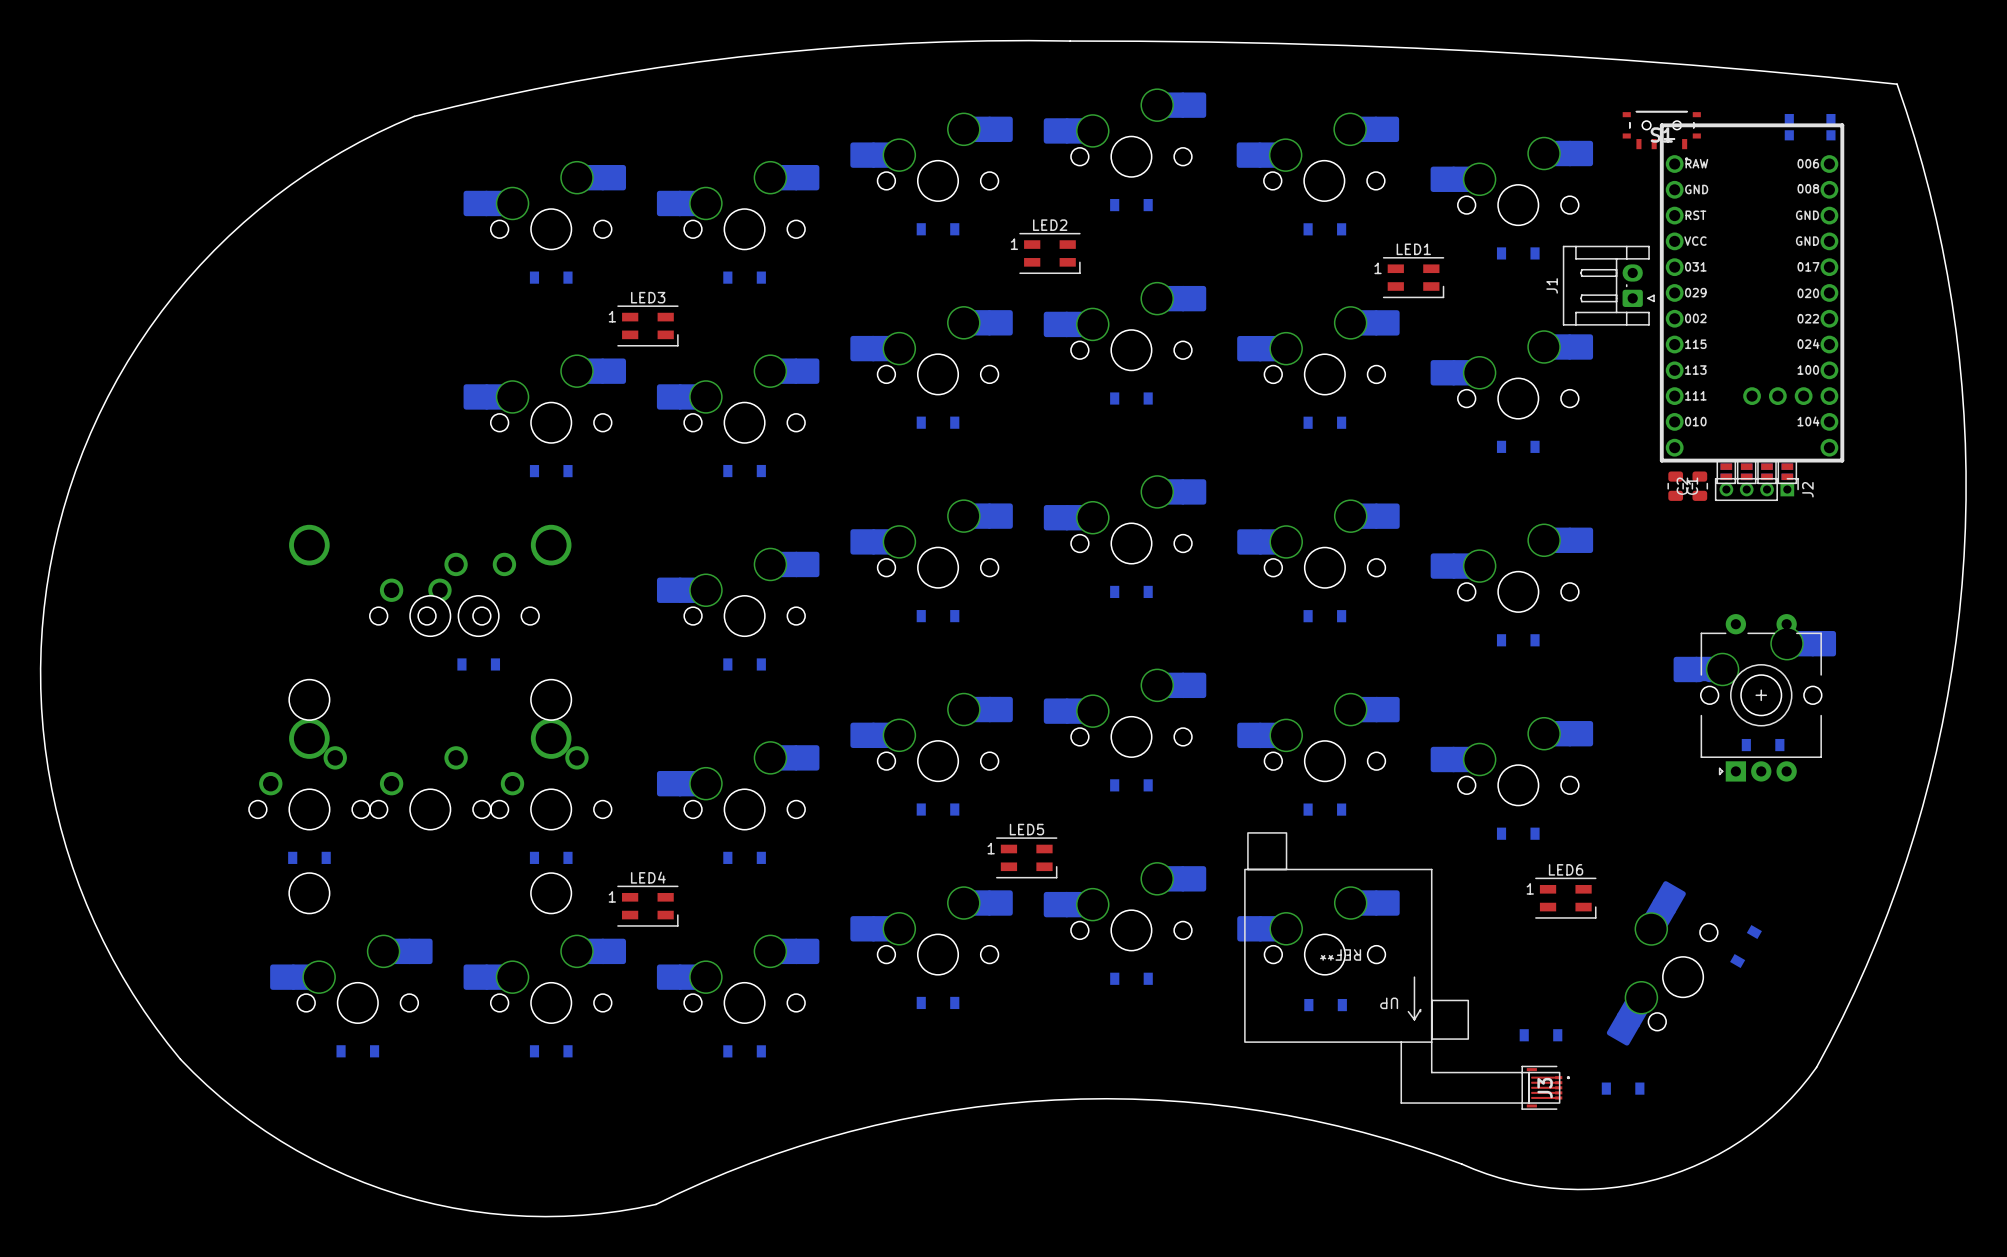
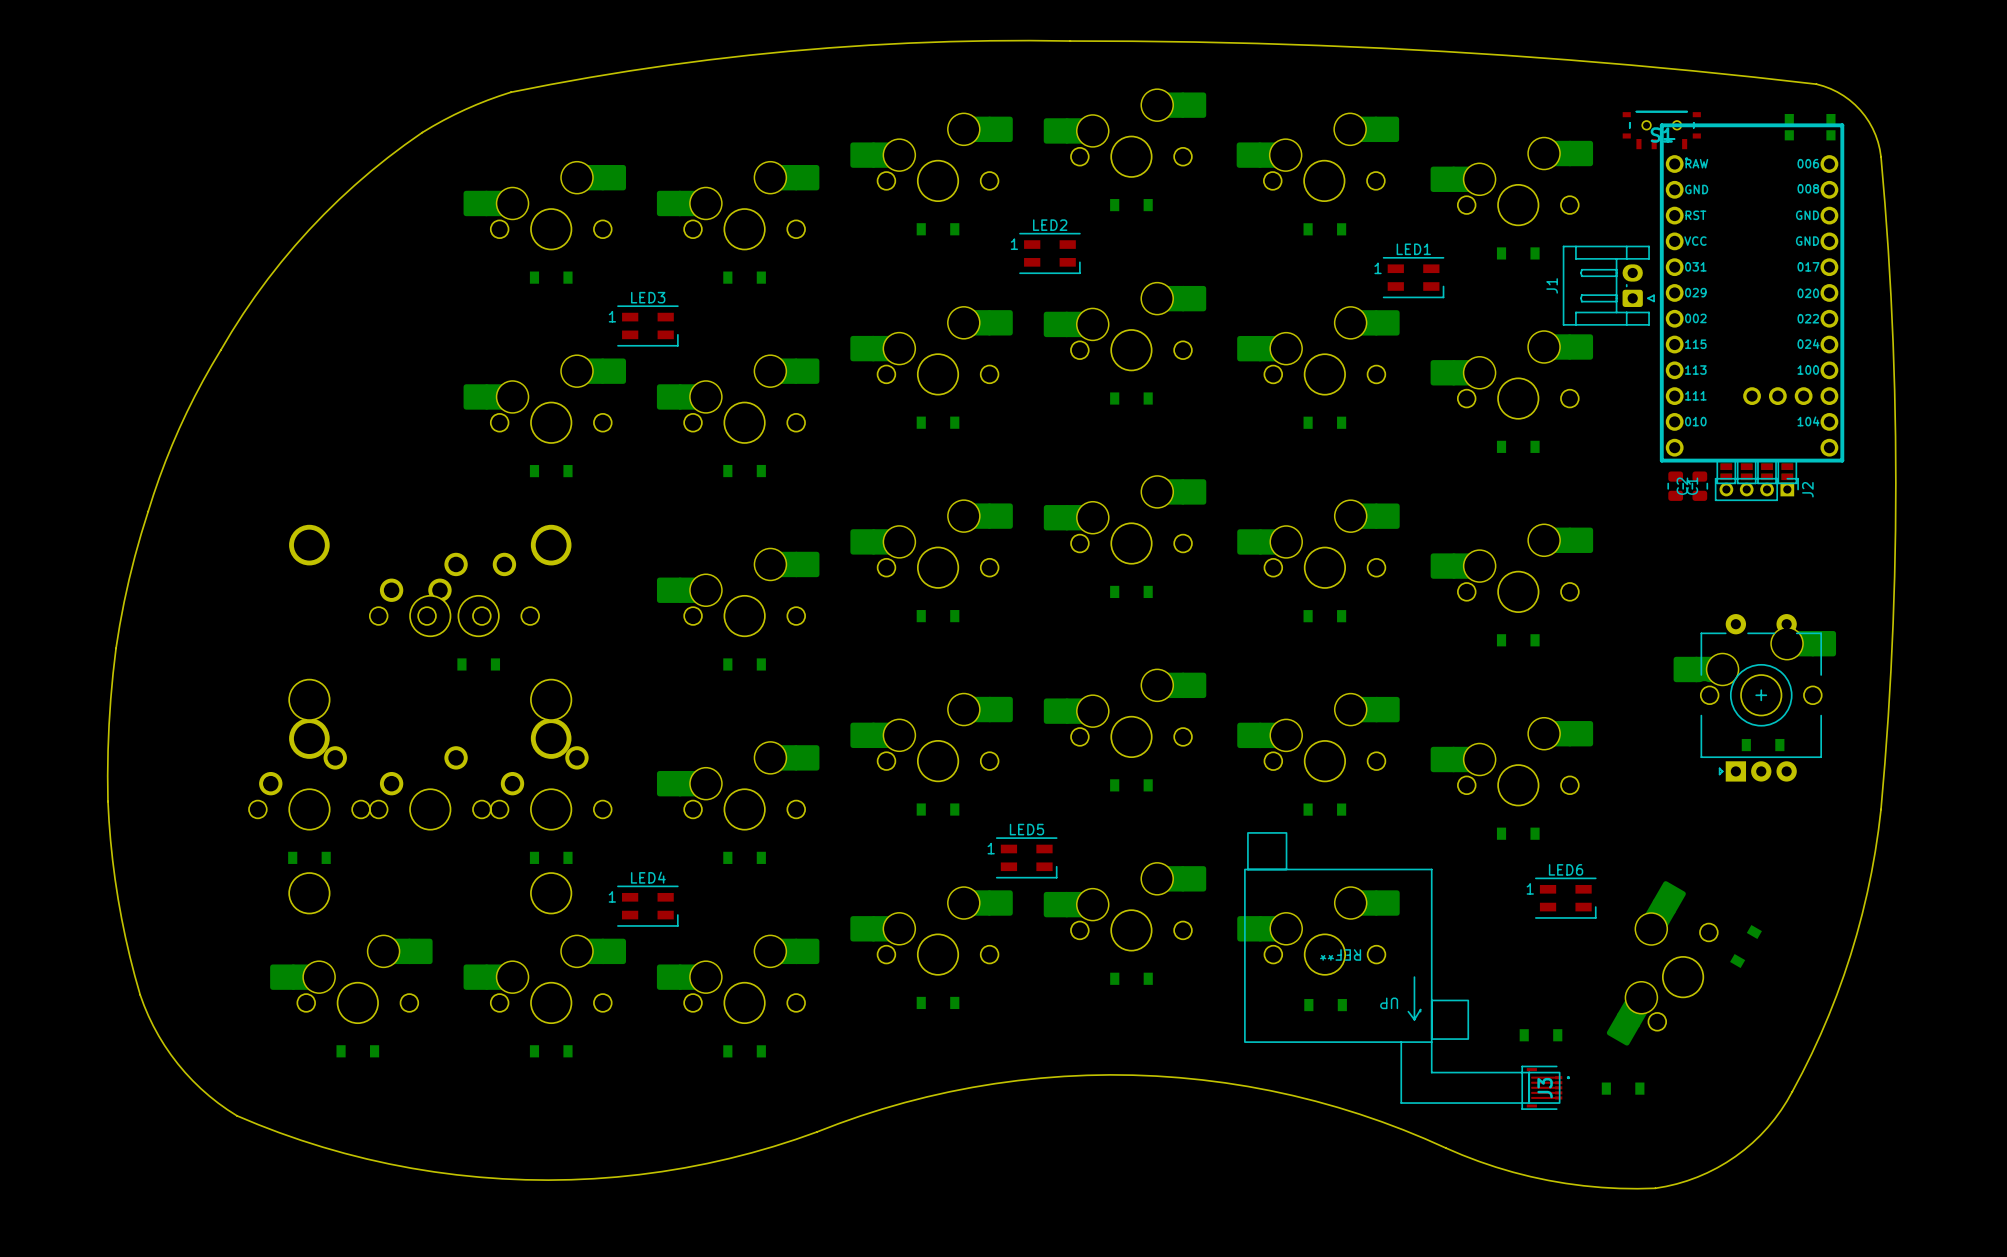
board edge: (1070, 41) (904, 43) (739, 56) (576, 81) (414, 116) (341, 151) (290, 184) (228, 236) (174, 295) (149, 327) (117, 378) (90, 433) (69, 489) (53, 548) (44, 608) (41, 648) (41, 708) (48, 769) (60, 828) (79, 885) (103, 941) (133, 994) (167, 1043) (193, 1072) (235, 1109) (265, 1131) (313, 1159) (346, 1175) (399, 1194) (434, 1204) (489, 1213) (564, 1216) (601, 1213) (656, 1204) (703, 1182) (775, 1154) (875, 1125) (977, 1106) (1080, 1099) (1184, 1101) (1261, 1111) (1363, 1132) (1437, 1155) (1486, 1173) (1525, 1184) (1564, 1189) (1617, 1187) (1669, 1175) (1718, 1154) (1751, 1133) (1772, 1116) (1808, 1078) (1829, 1042) (1866, 966) (1897, 887) (1914, 833) (1929, 779) (1947, 696) (1962, 584) (1965, 528) (1965, 443) (1956, 330) (1936, 219) (1922, 164) (1897, 84) (1690, 65) (1484, 51) (1277, 43) (1070, 41) -> (1070, 41) (949, 41) (789, 51) (629, 70) (510, 92) (454, 114) (404, 144) (339, 199) (281, 262) (243, 313) (211, 365) (186, 412) (165, 461) (141, 533) (129, 579) (116, 648) (110, 699) (107, 775) (109, 821) (115, 879) (129, 956) (140, 994) (158, 1035) (185, 1072) (209, 1096) (236, 1115) (301, 1140) (344, 1153) (434, 1171) (525, 1179) (594, 1178) (684, 1167) (773, 1146) (860, 1115) (927, 1096) (995, 1083) (1063, 1076) (1110, 1074) (1179, 1077) (1270, 1090) (1359, 1114) (1479, 1161) (1513, 1172) (1565, 1183) (1601, 1187) (1655, 1188) (1697, 1177) (1717, 1167) (1744, 1149) (1774, 1119) (1787, 1101) (1811, 1053) (1844, 975) (1867, 893) (1881, 809) (1893, 623) (1895, 436) (1893, 343) (1884, 203) (1879, 149) (1869, 122) (1849, 100) (1823, 86) (1692, 70) (1568, 59) (1381, 48) (1257, 43) (1070, 41)

